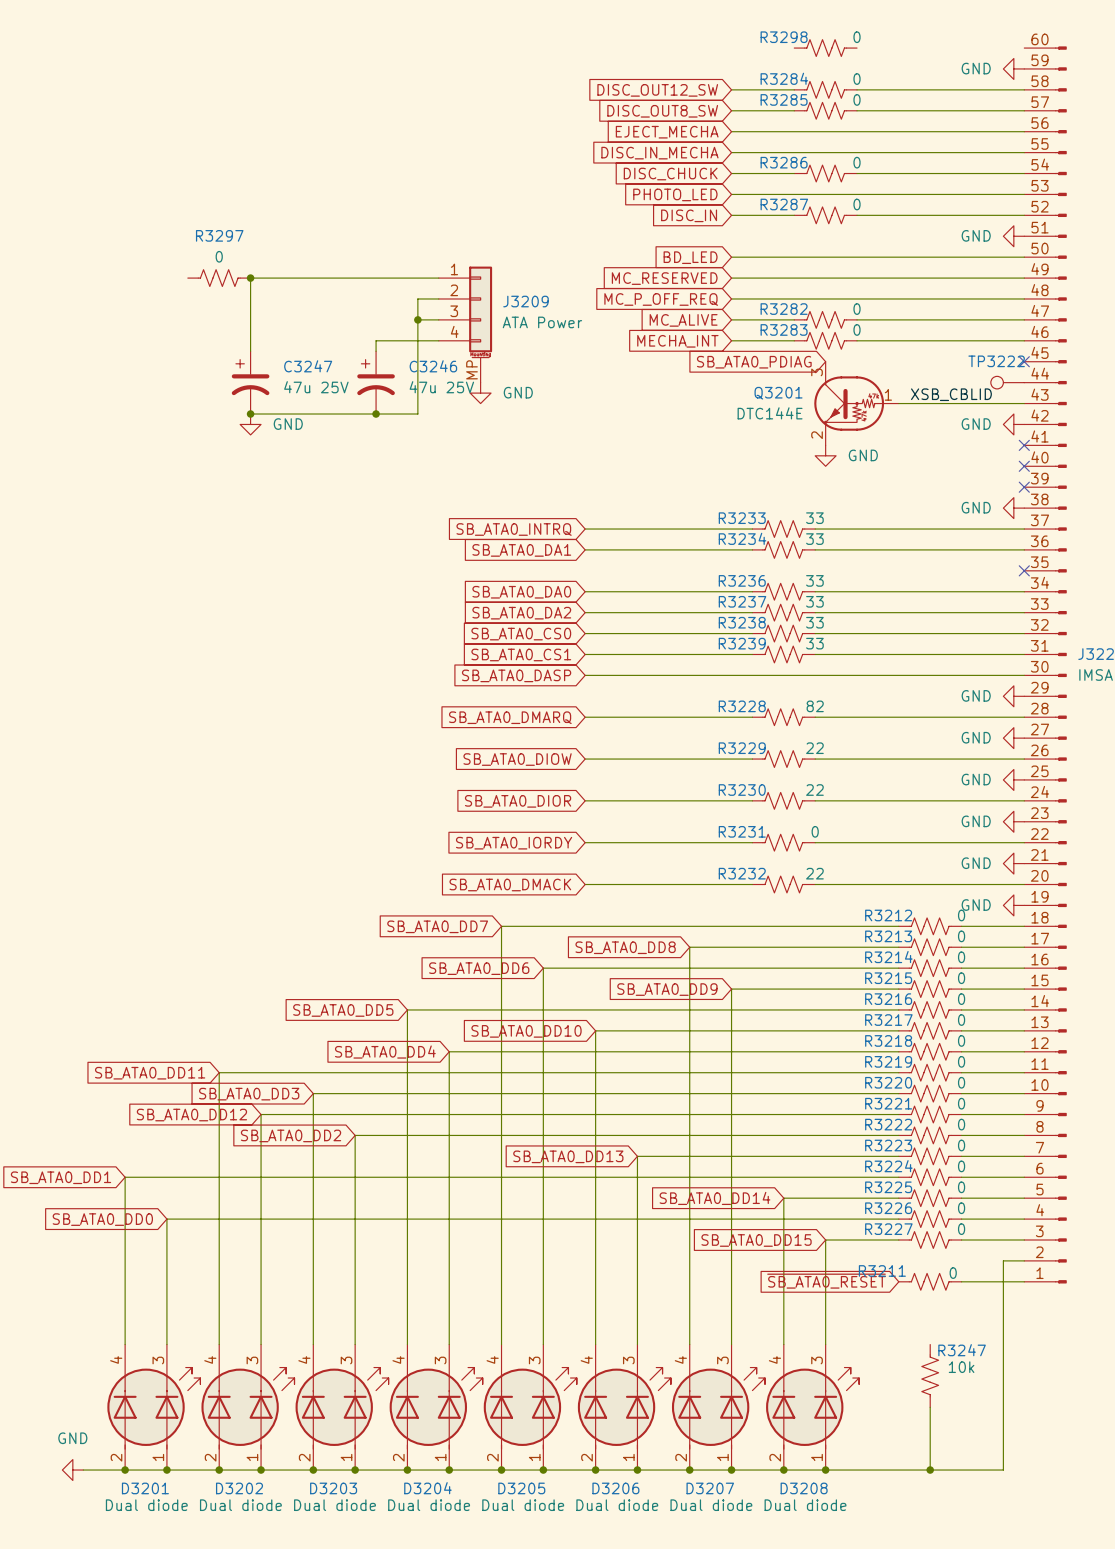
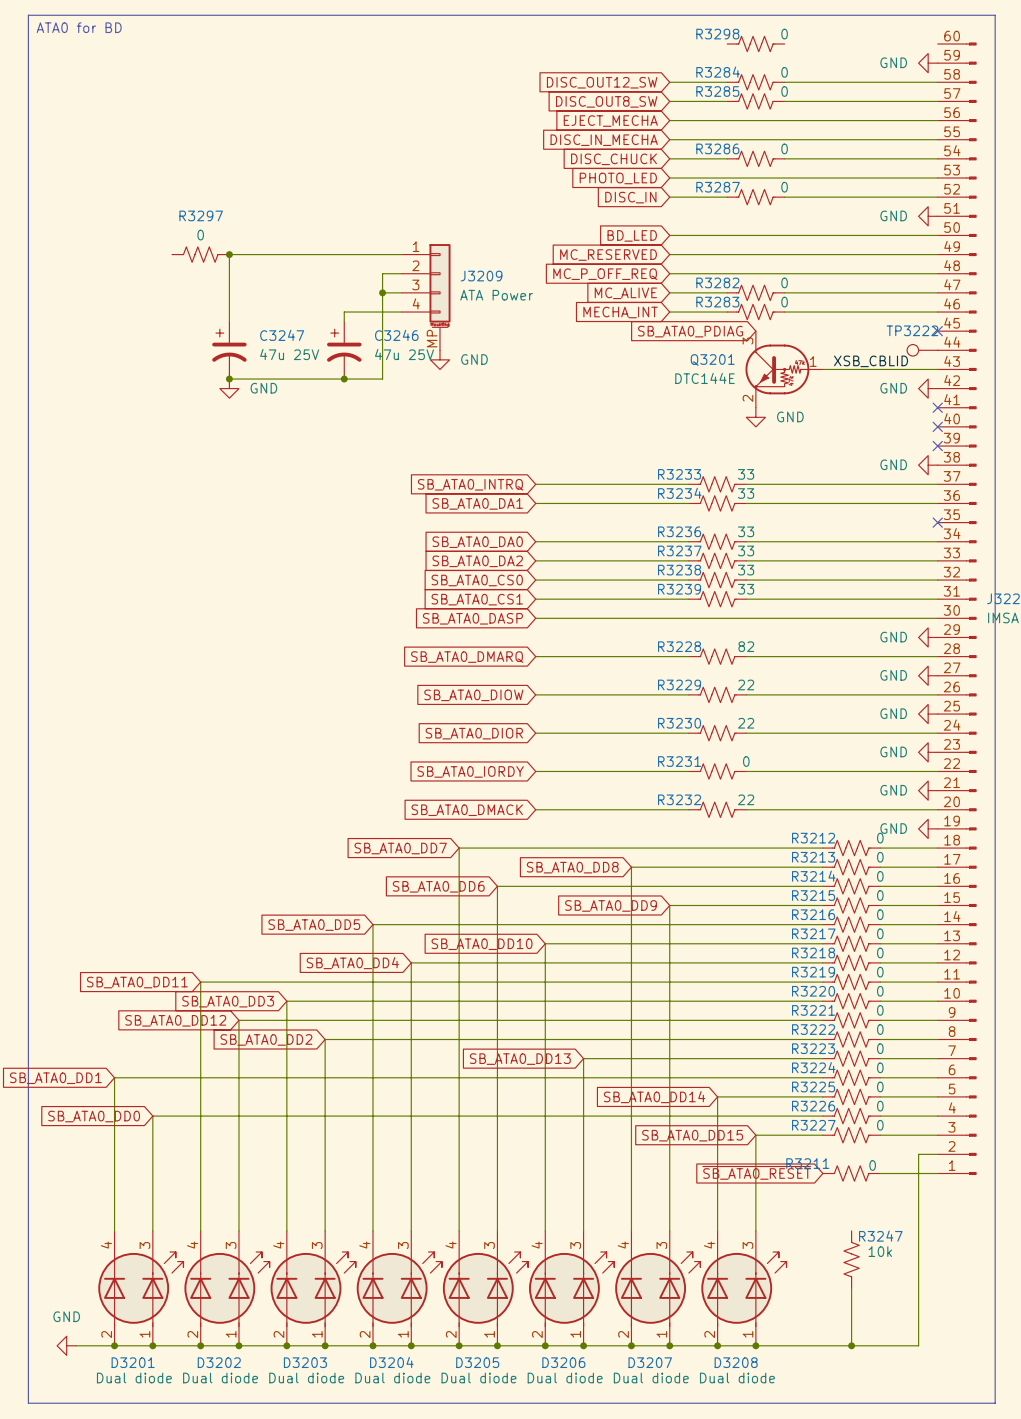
line: none -> (28, 15) (995, 15) (995, 1403) (28, 1403) (28, 15)
text: none -> ATA0 for BD (79, 27)

